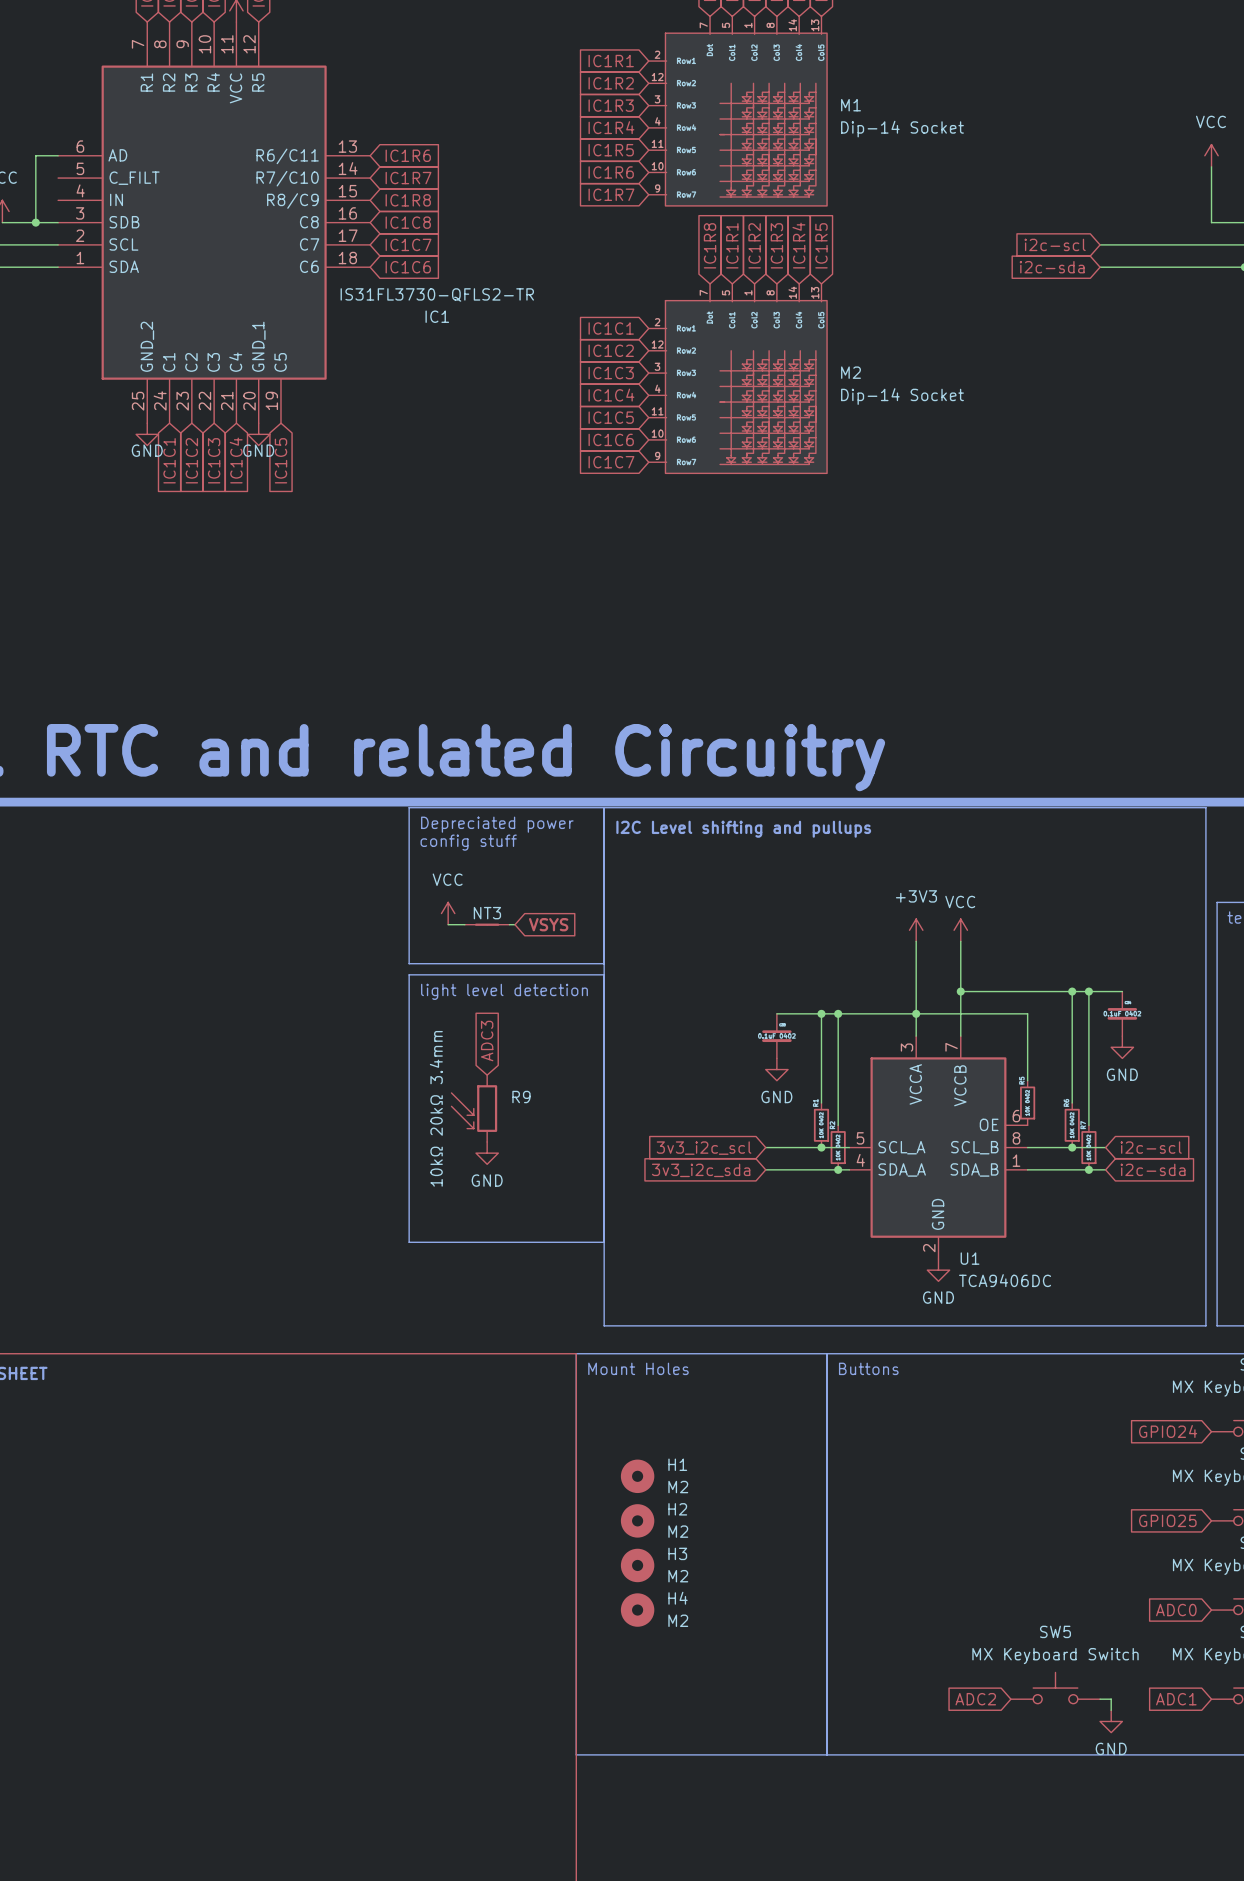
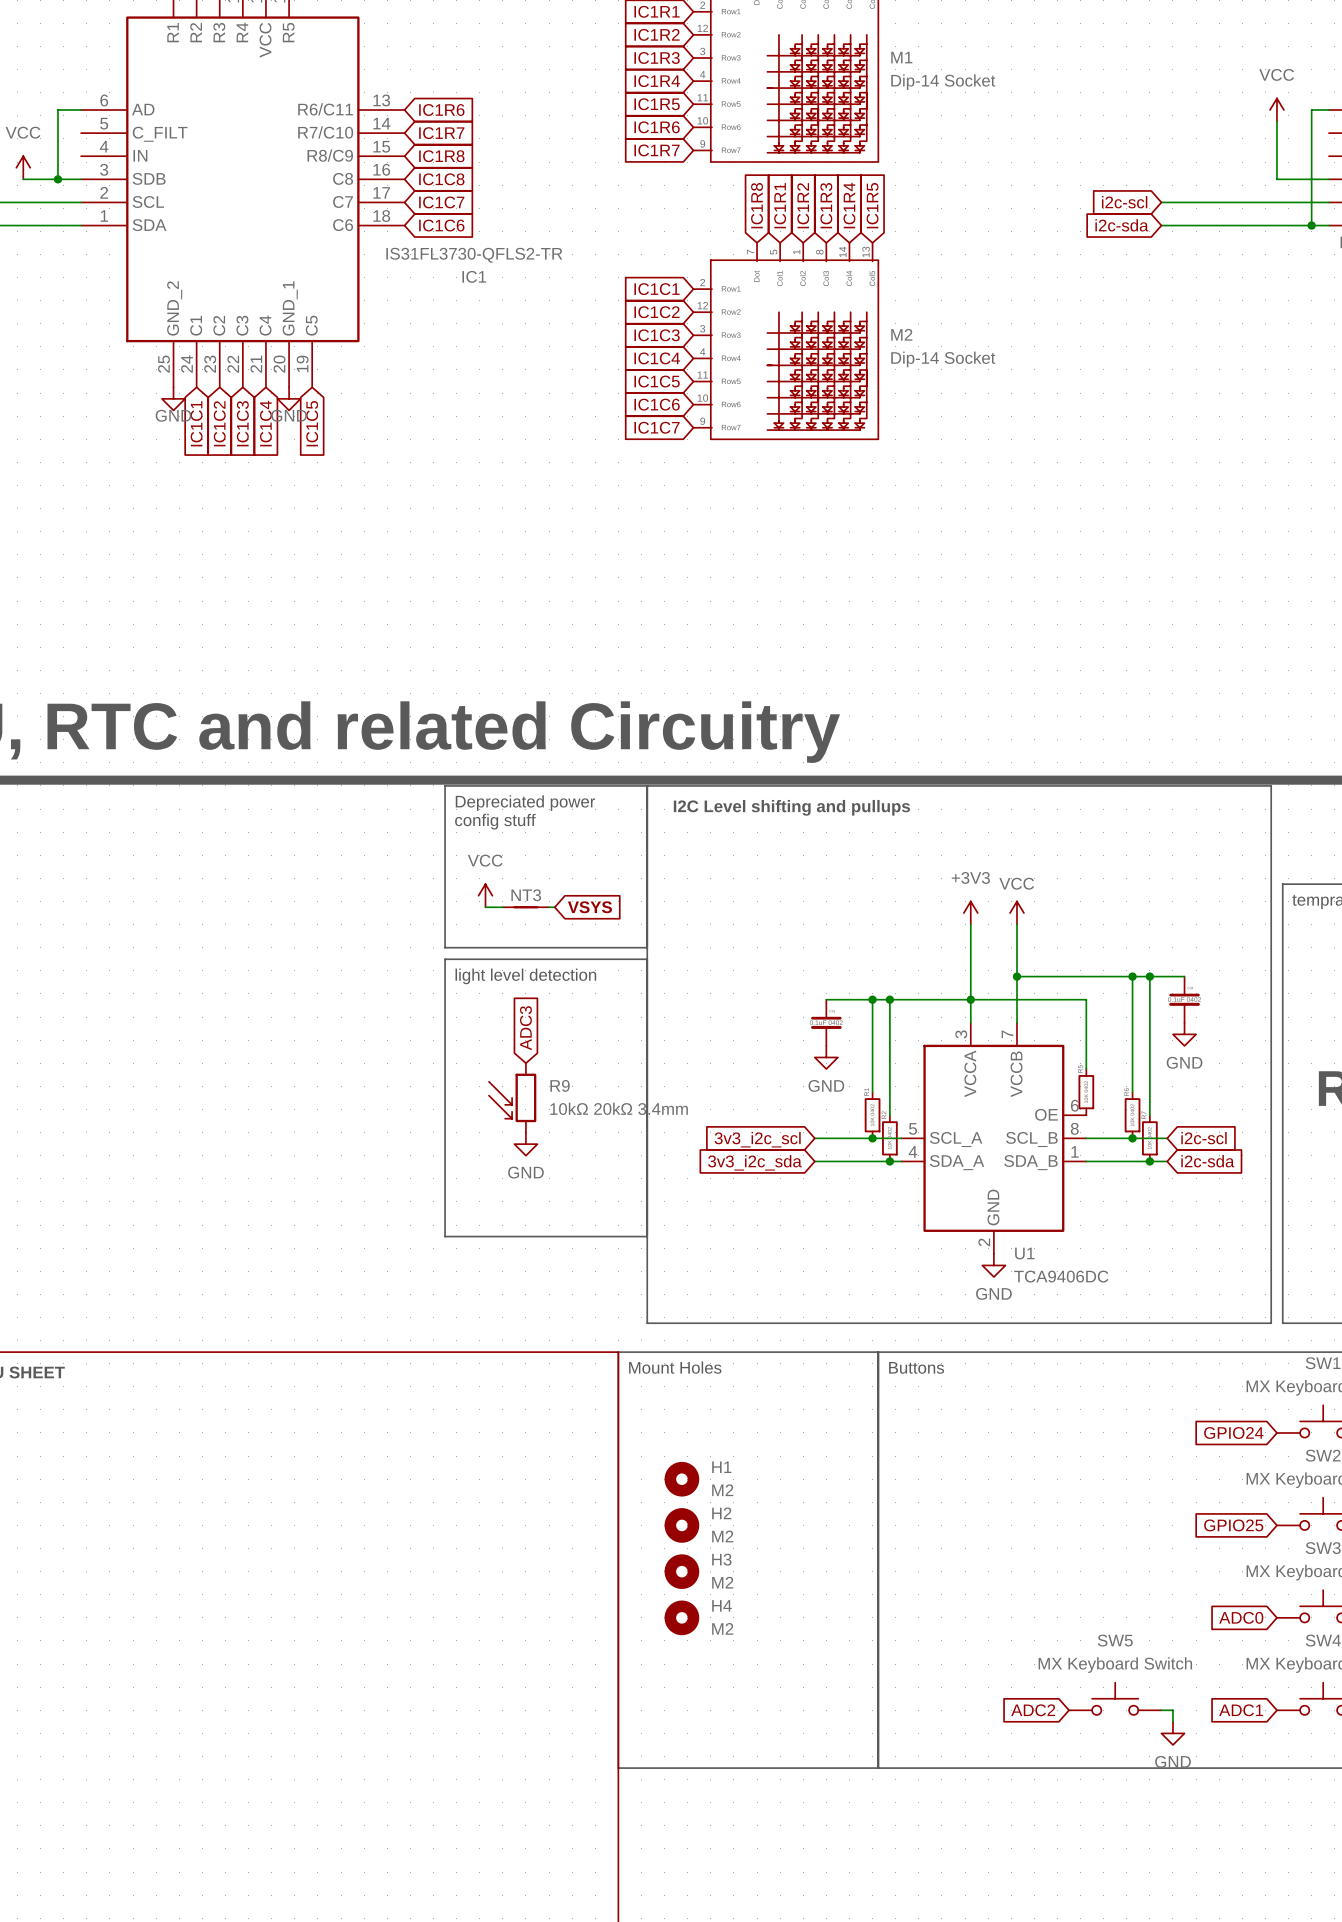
R9 value rotation: 0° (436, 1108) -> 90° clockwise (619, 1108)

